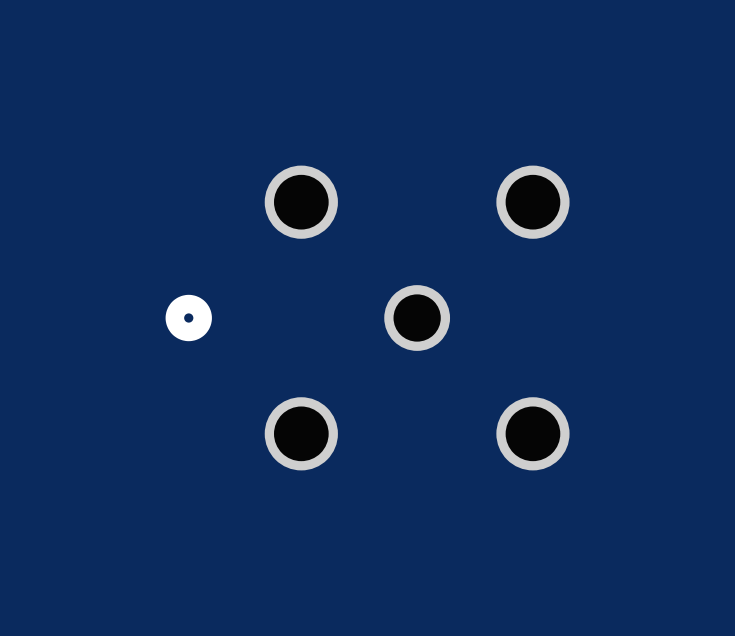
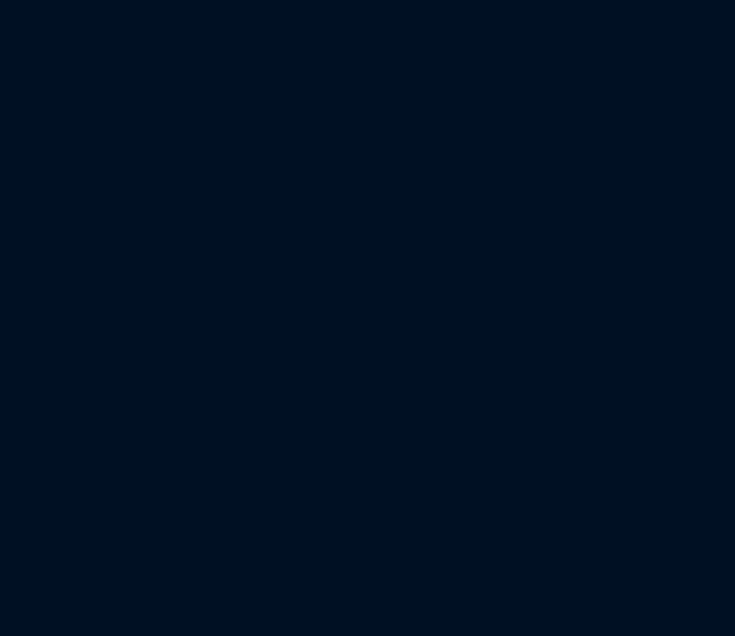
part: (367, 318) -> none

